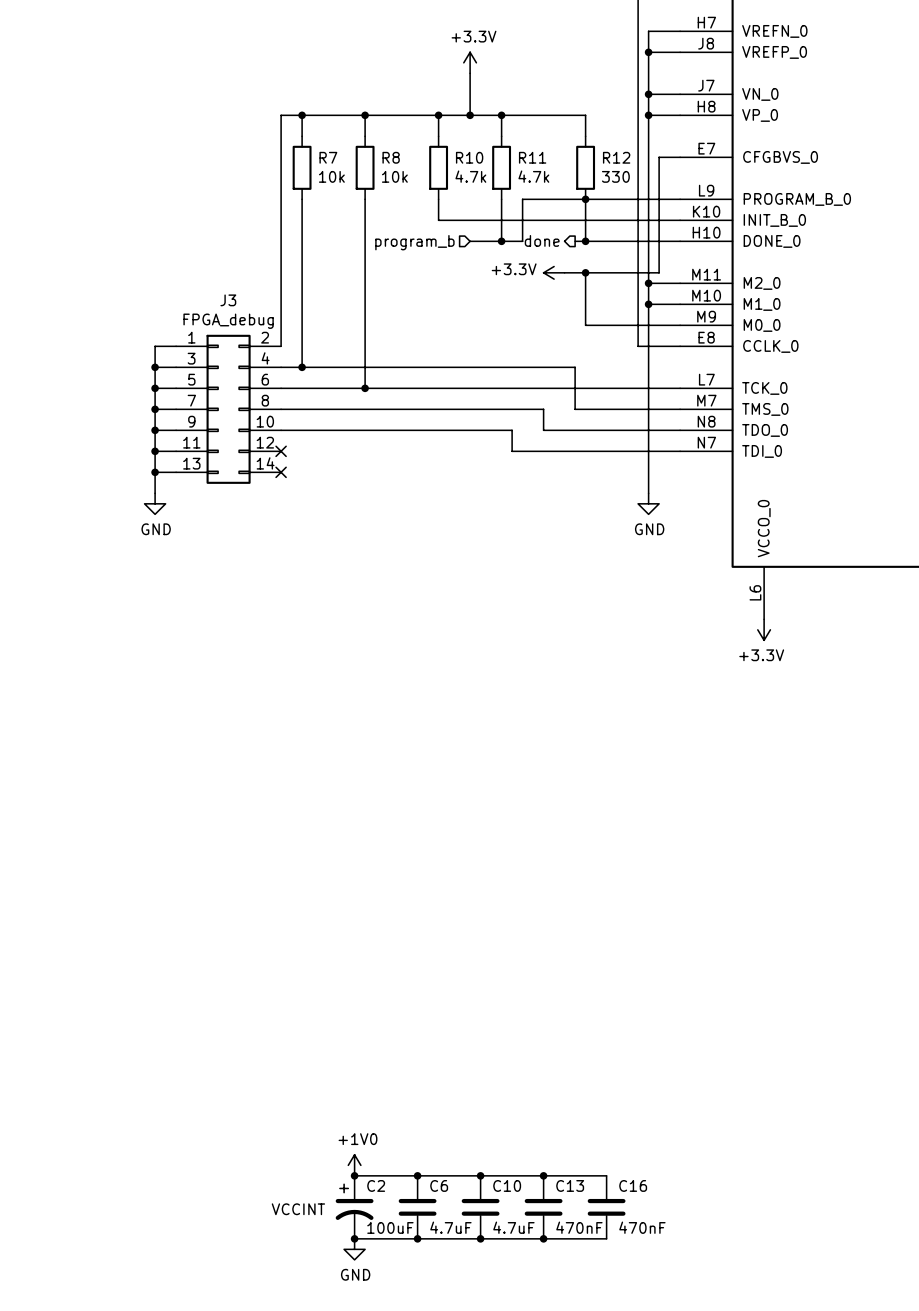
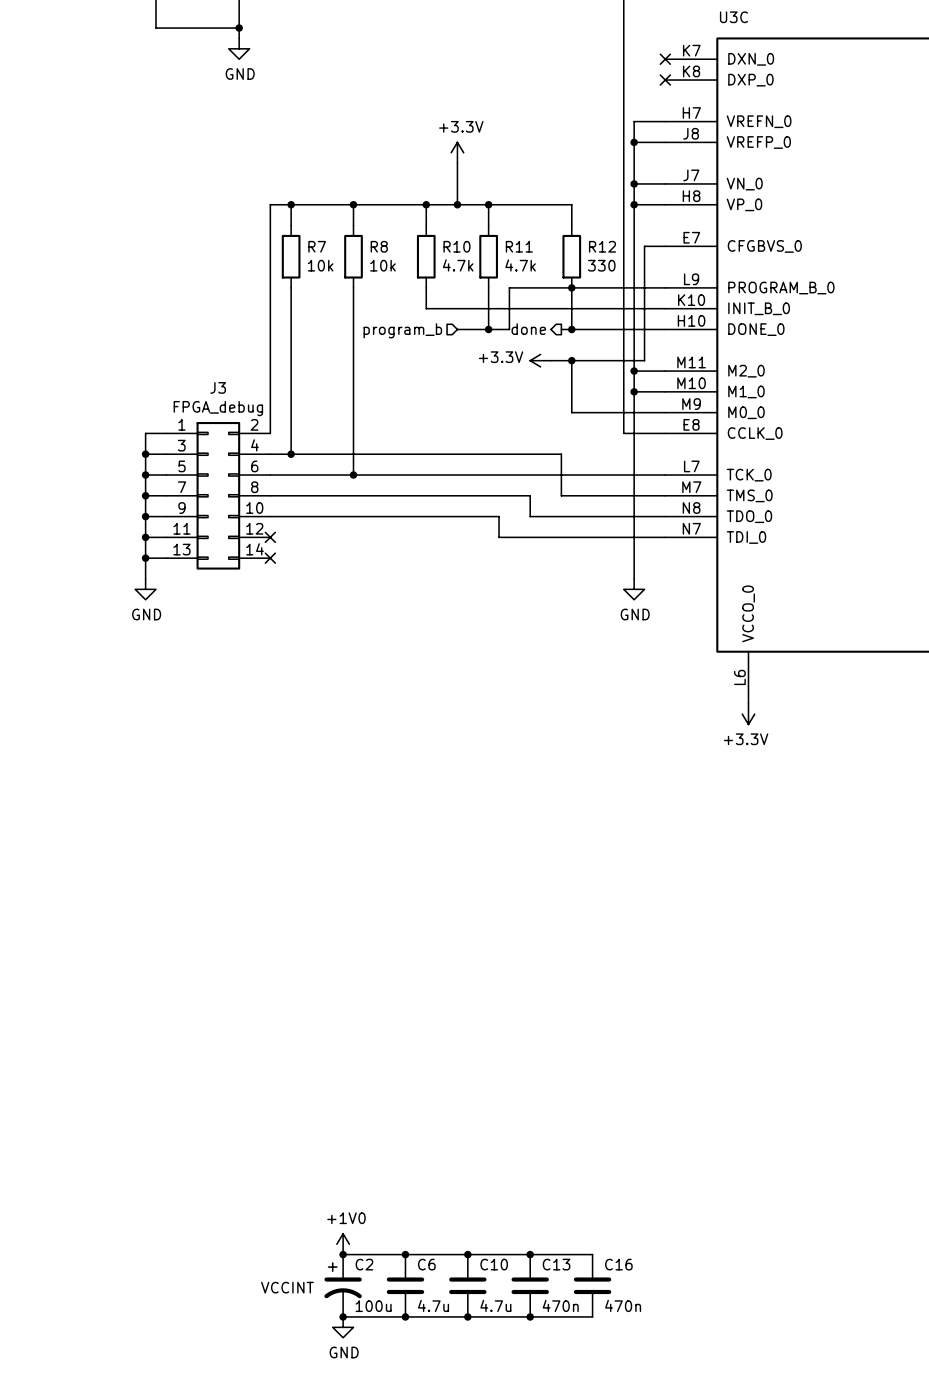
C2 value: 100uF (390, 1227) -> 100u (373, 1306)
C6 value: 4.7uF (450, 1227) -> 4.7u (433, 1305)
C10 value: 4.7uF (513, 1227) -> 4.7u (495, 1305)
C13 value: 470nF (579, 1227) -> 470n (560, 1305)
C16 value: 470nF (642, 1227) -> 470n (623, 1305)

